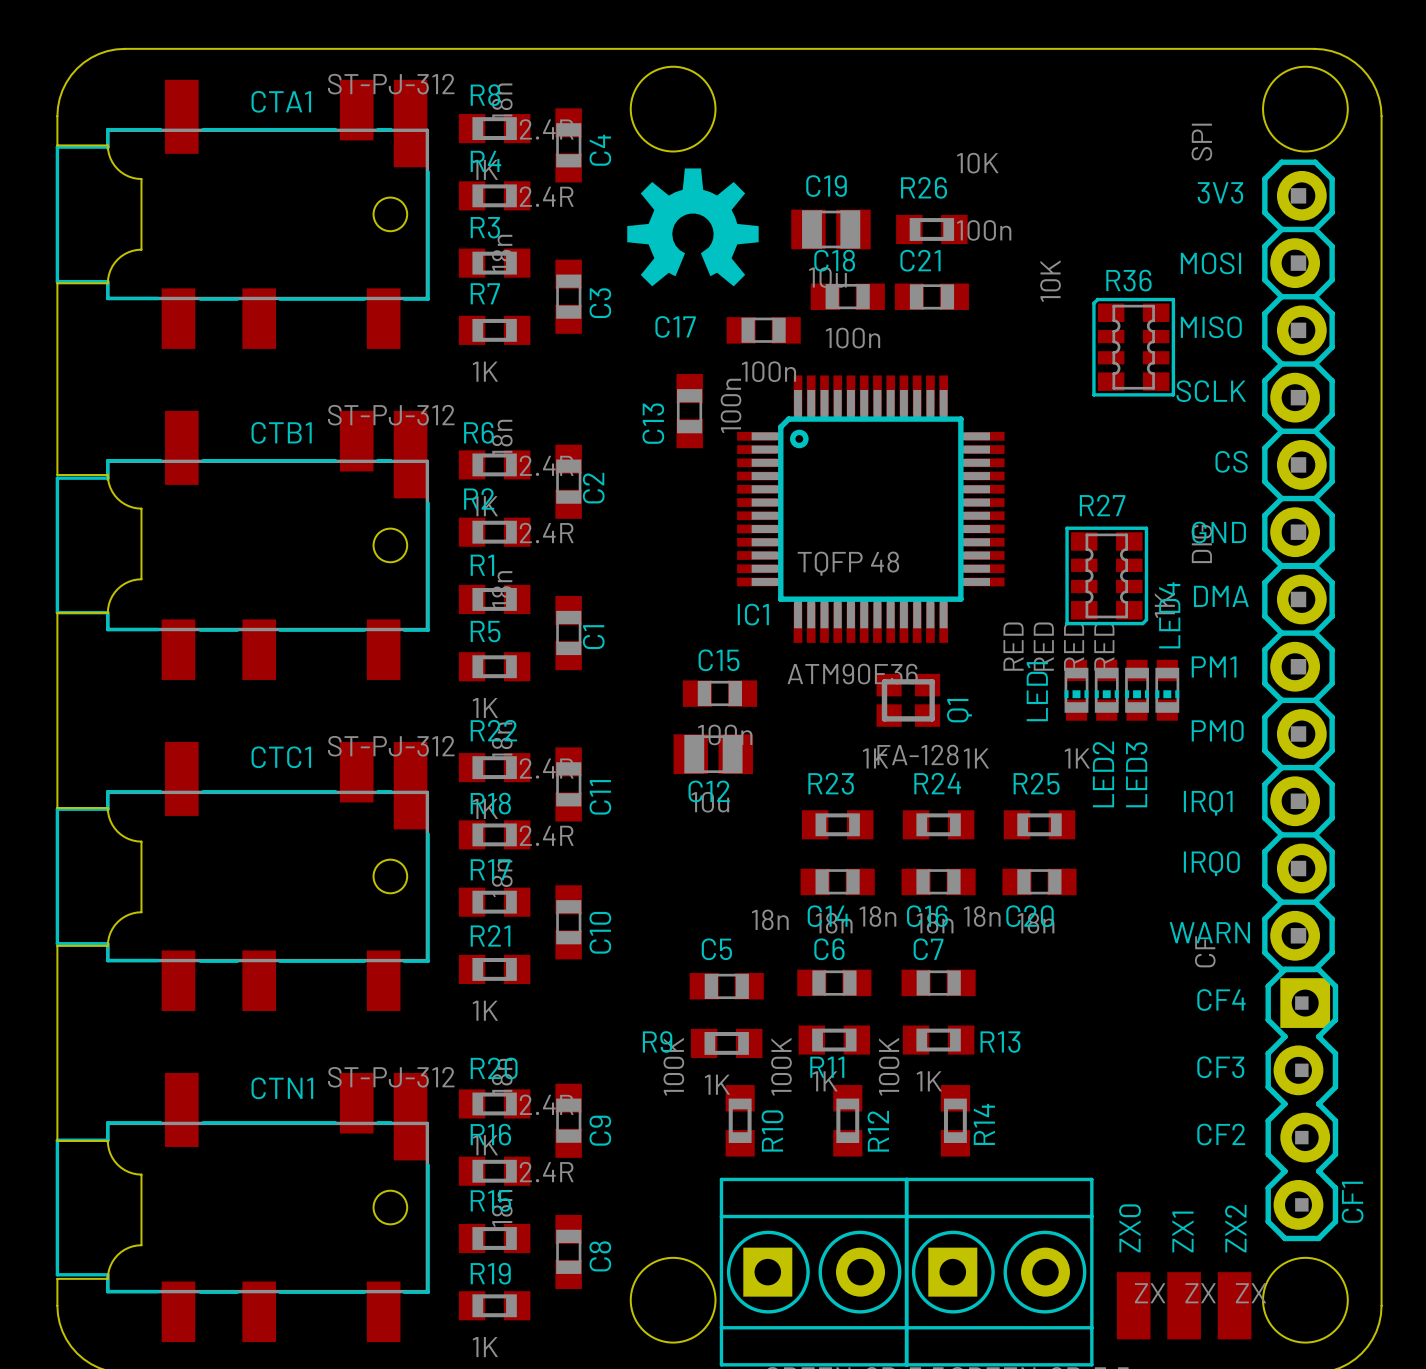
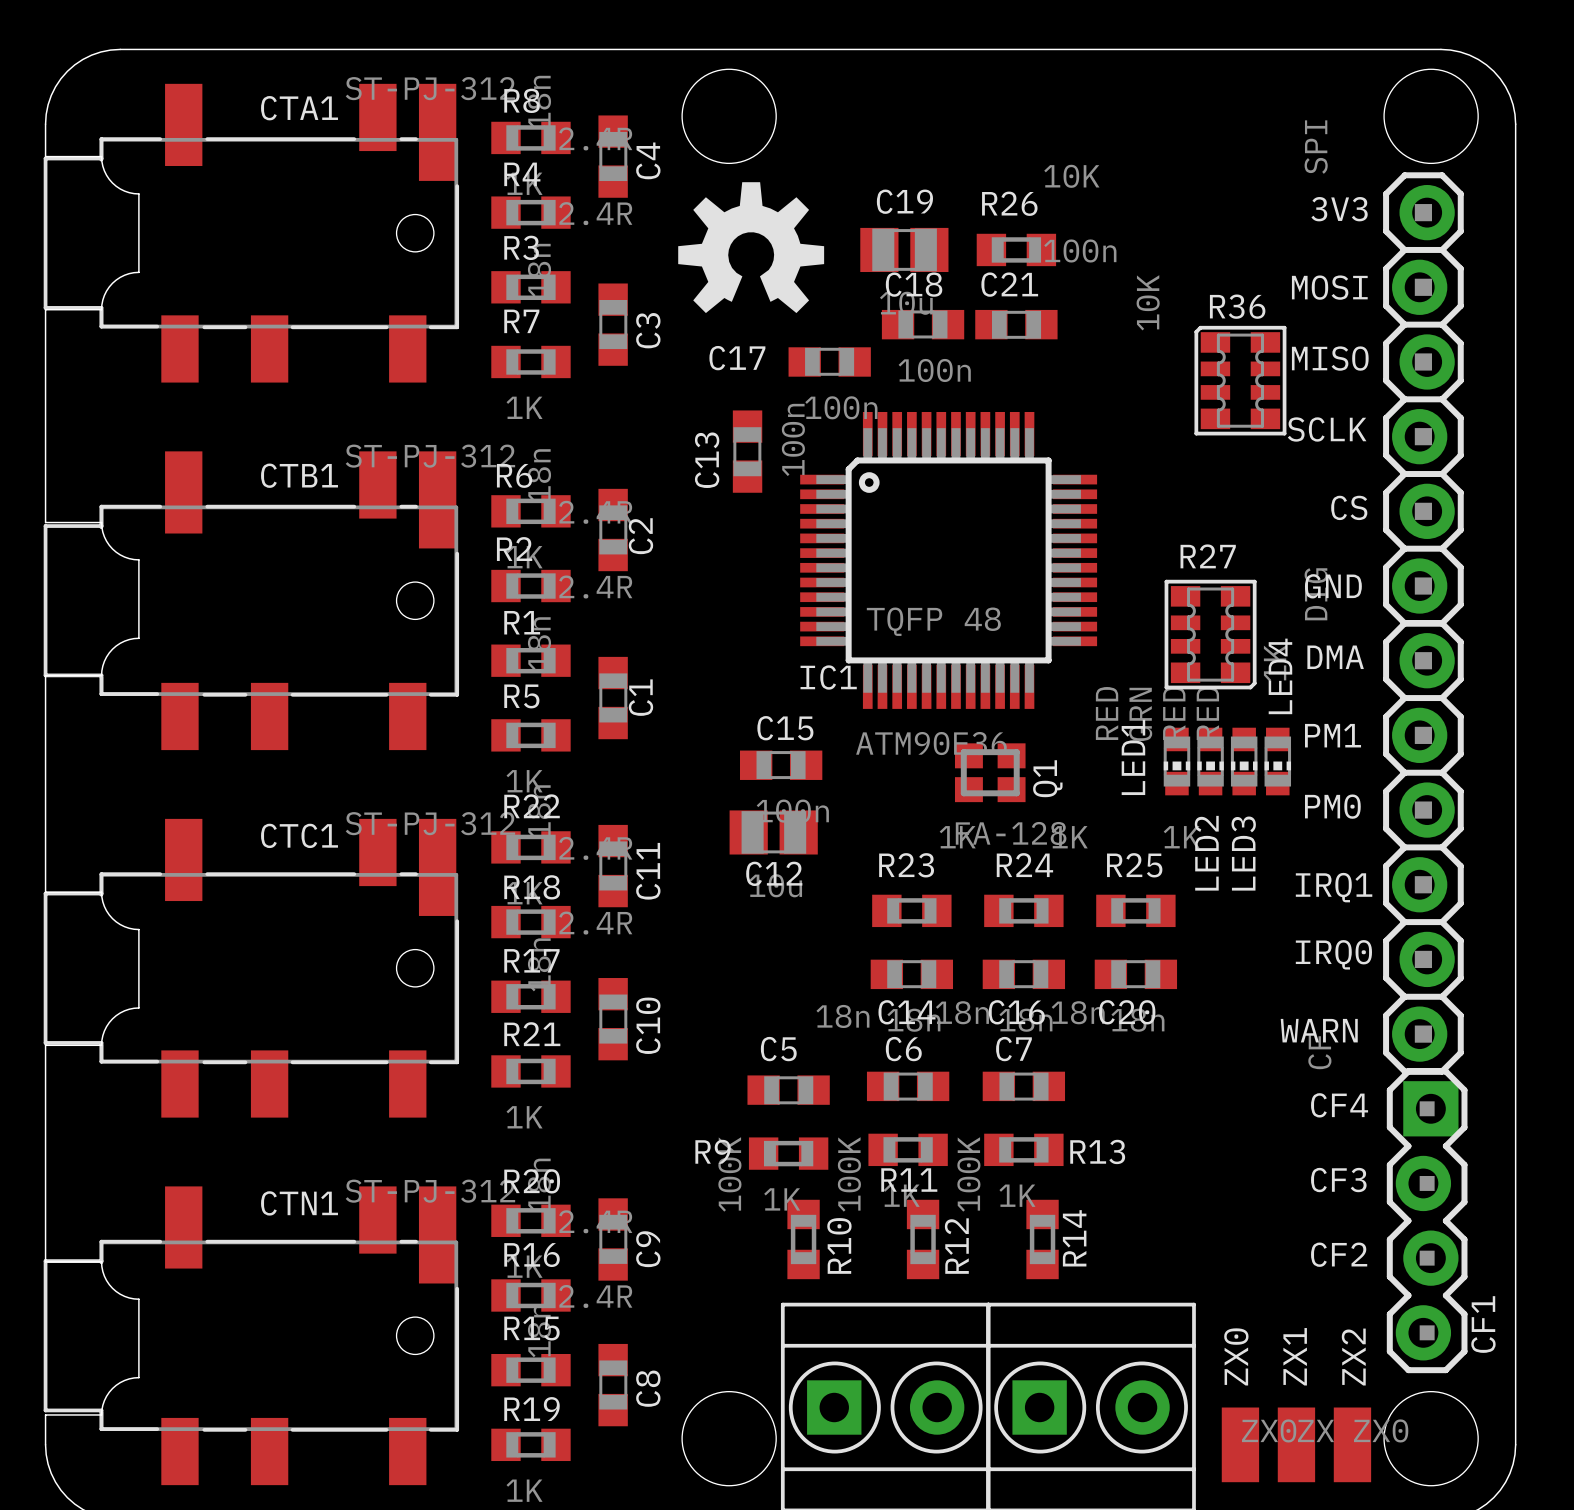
LED2 value: RED (1043, 646) -> GRN (1140, 714)
ZX0 value: ZX (1150, 1293) -> ZX0 (1269, 1430)
ZX2 value: ZX (1251, 1293) -> ZX0 (1381, 1430)

